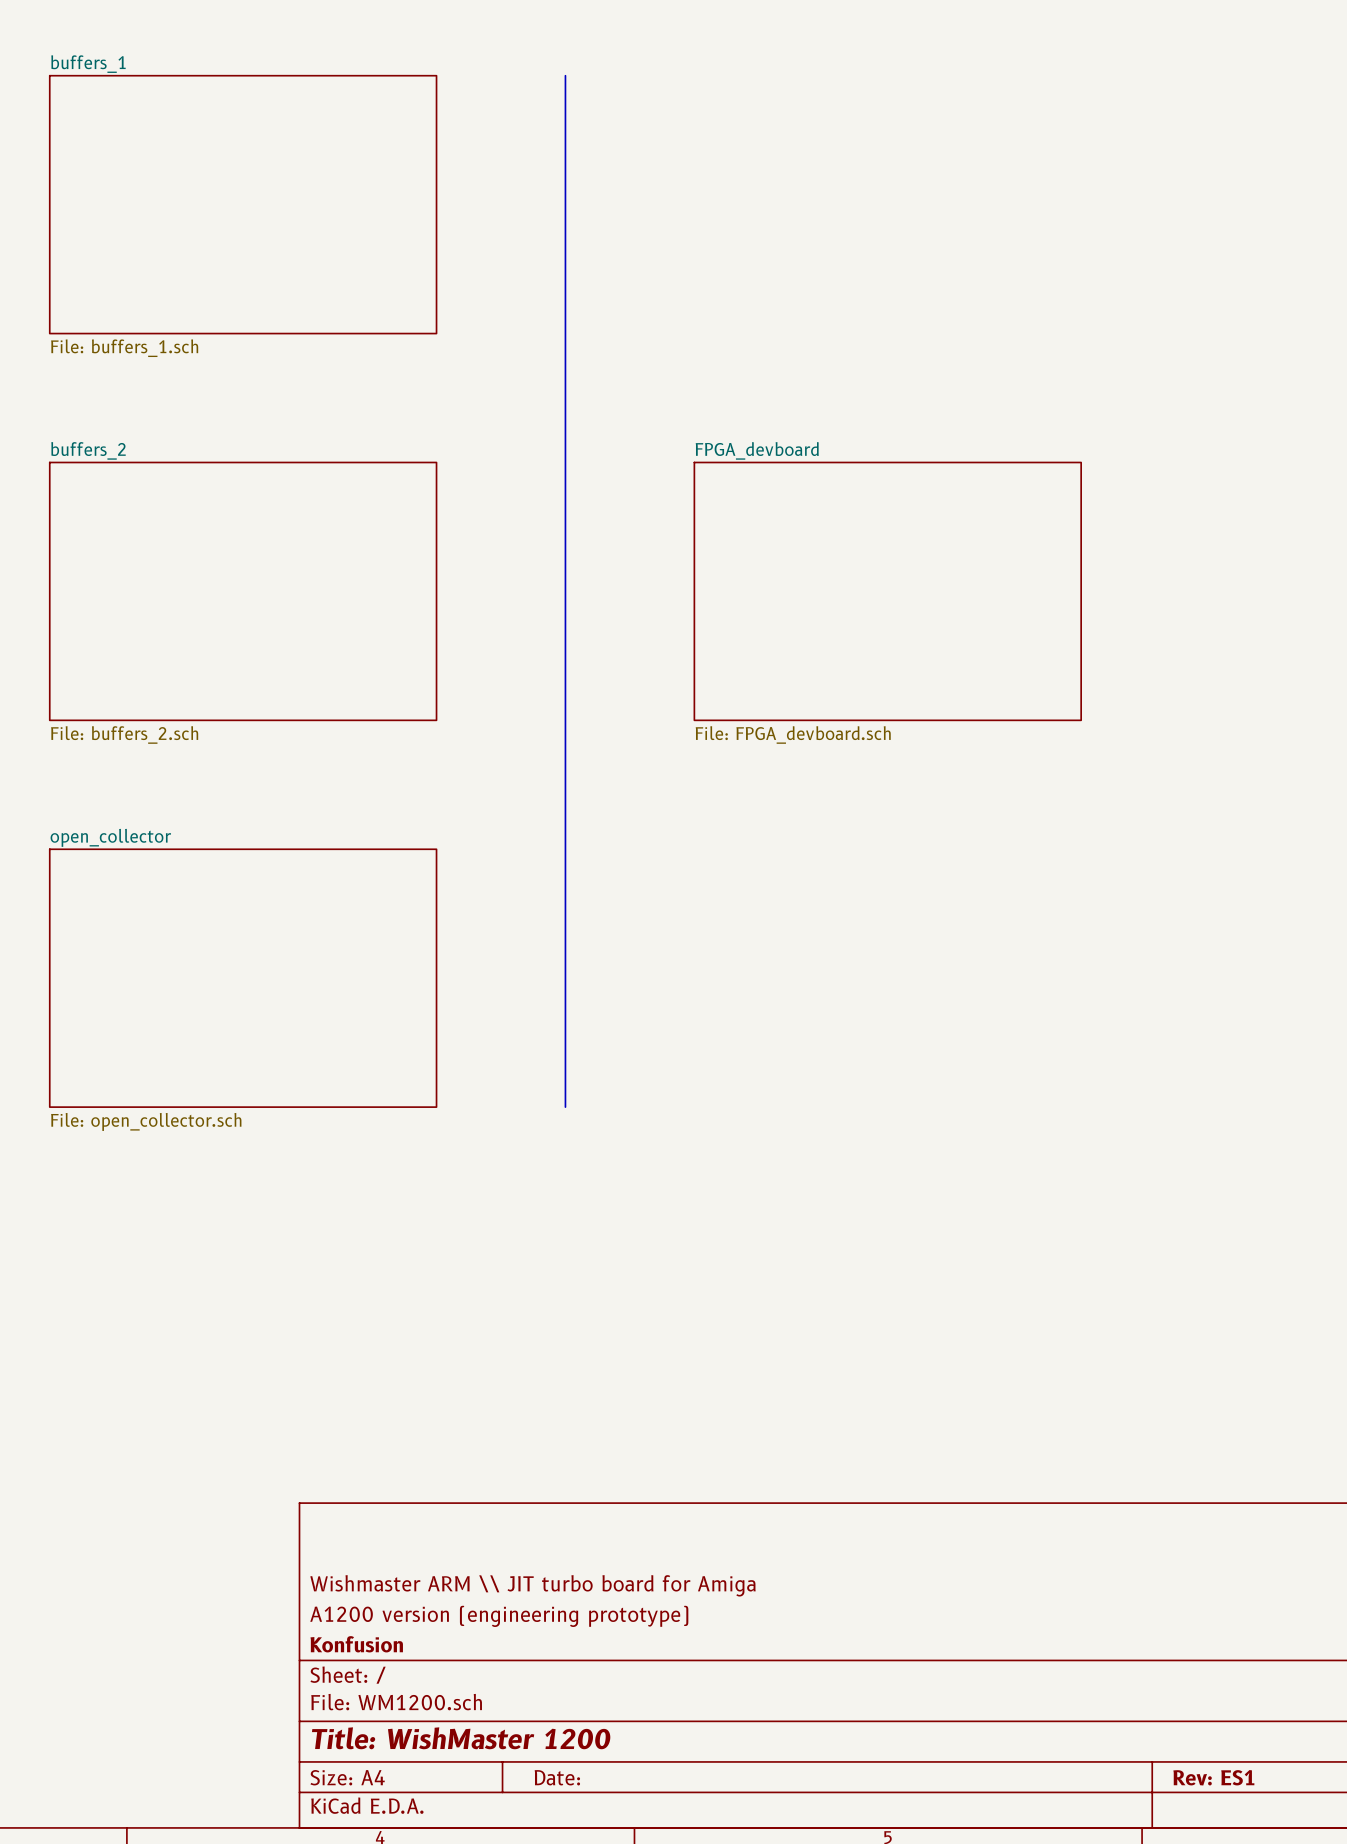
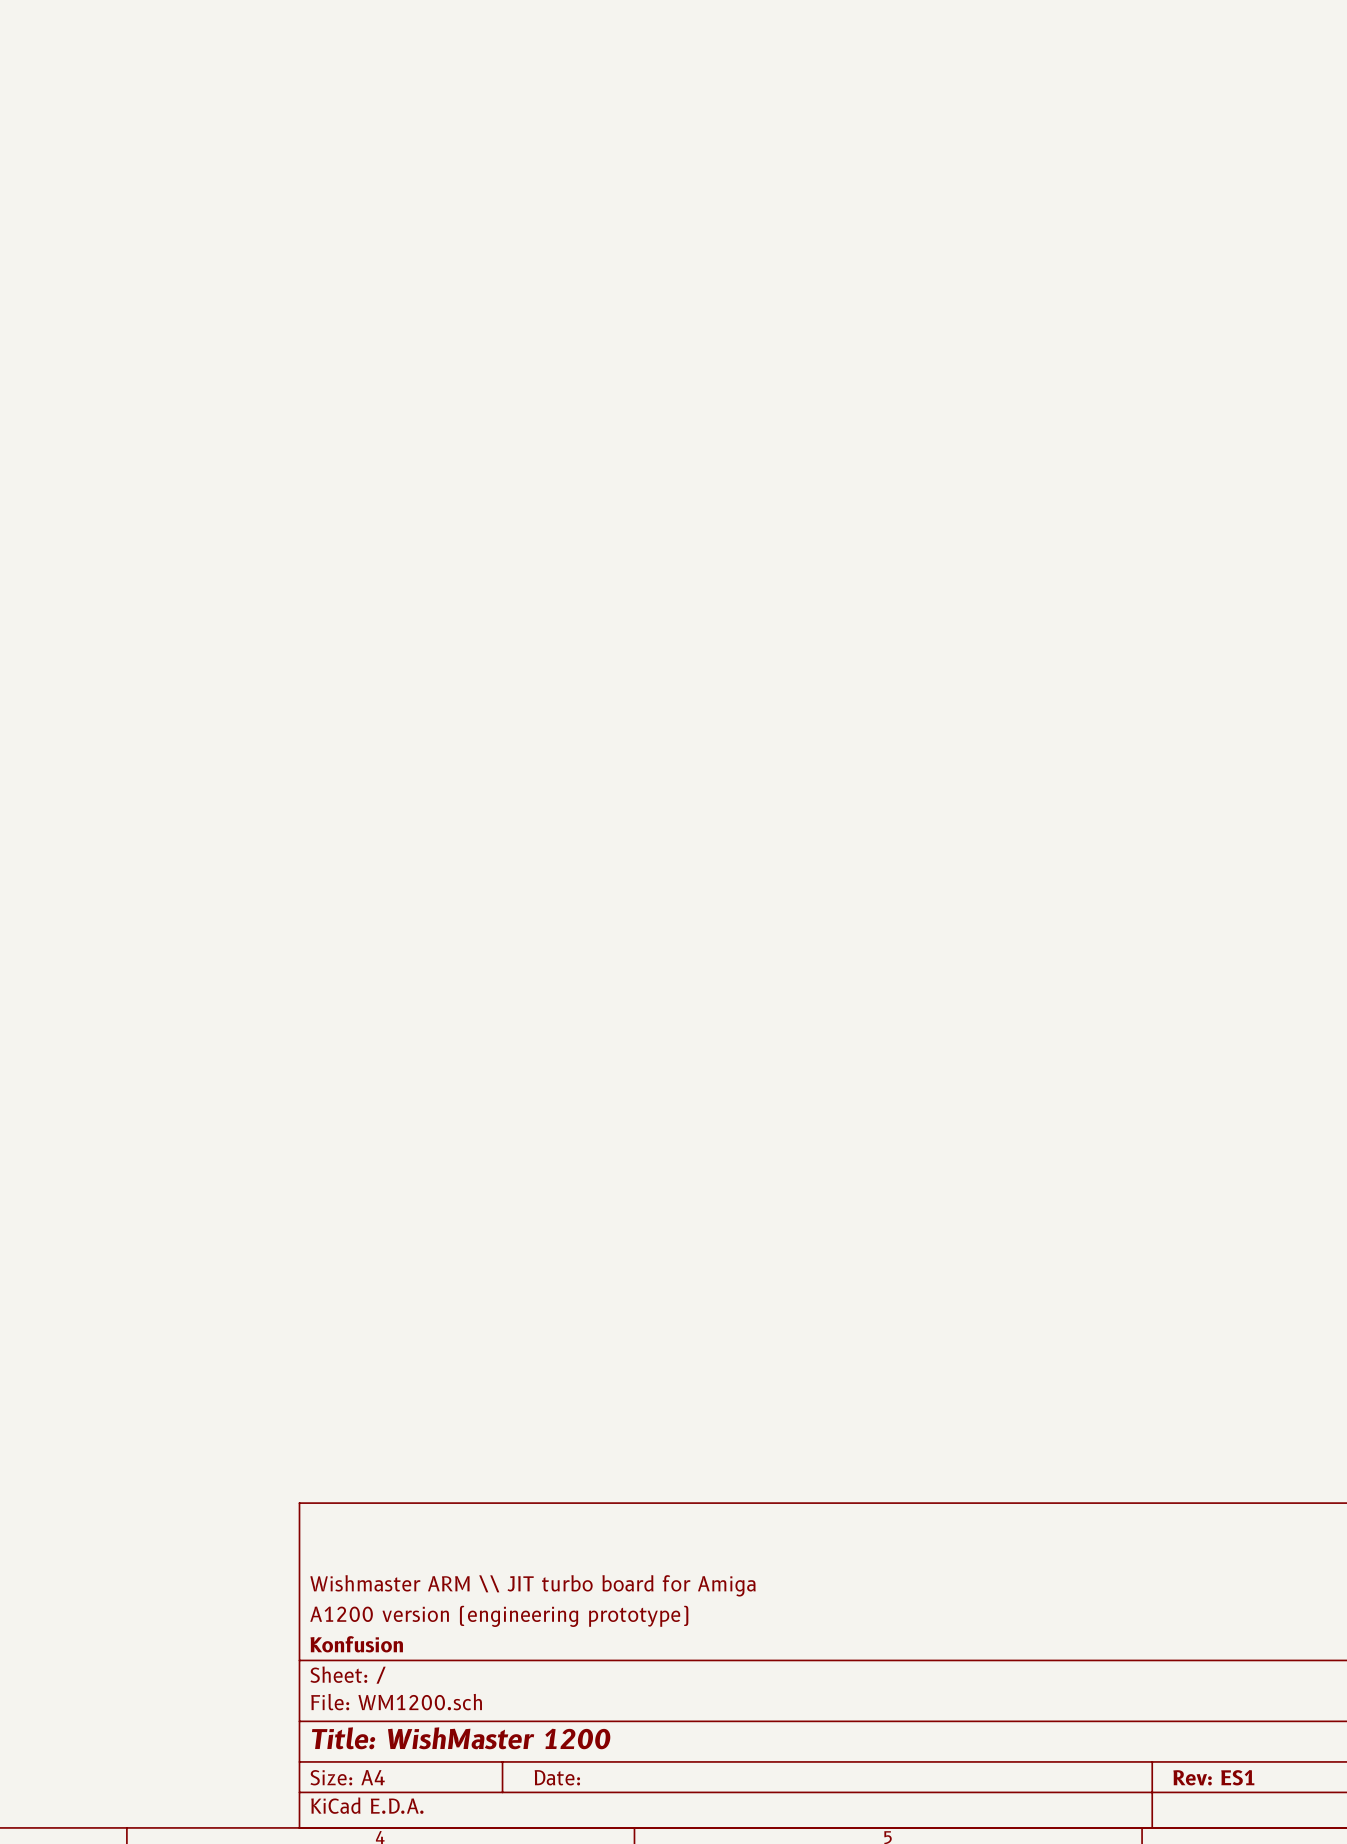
bus: (565, 75) (565, 1107) -> none
sheet buffers_1: File: buffers_1.sch (243, 204) -> none
sheet buffers_2: File: buffers_2.sch (243, 591) -> none
sheet FPGA_devboard: File: FPGA_devboard.sch (887, 591) -> none
sheet open_collector: File: open_collector.sch (243, 978) -> none

